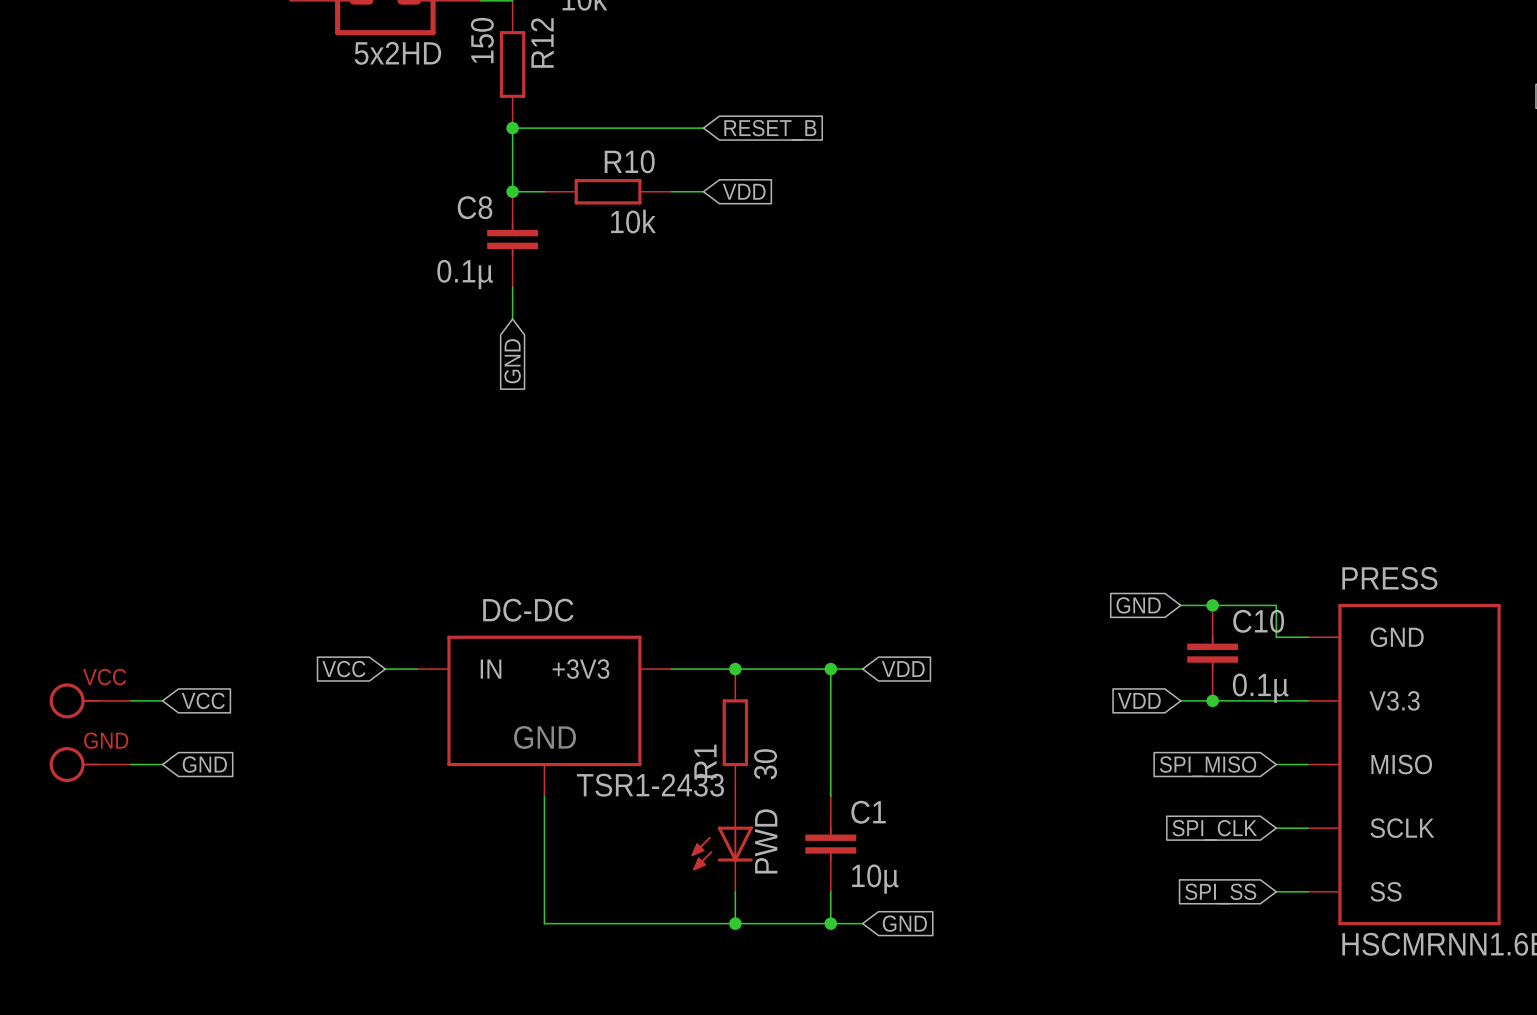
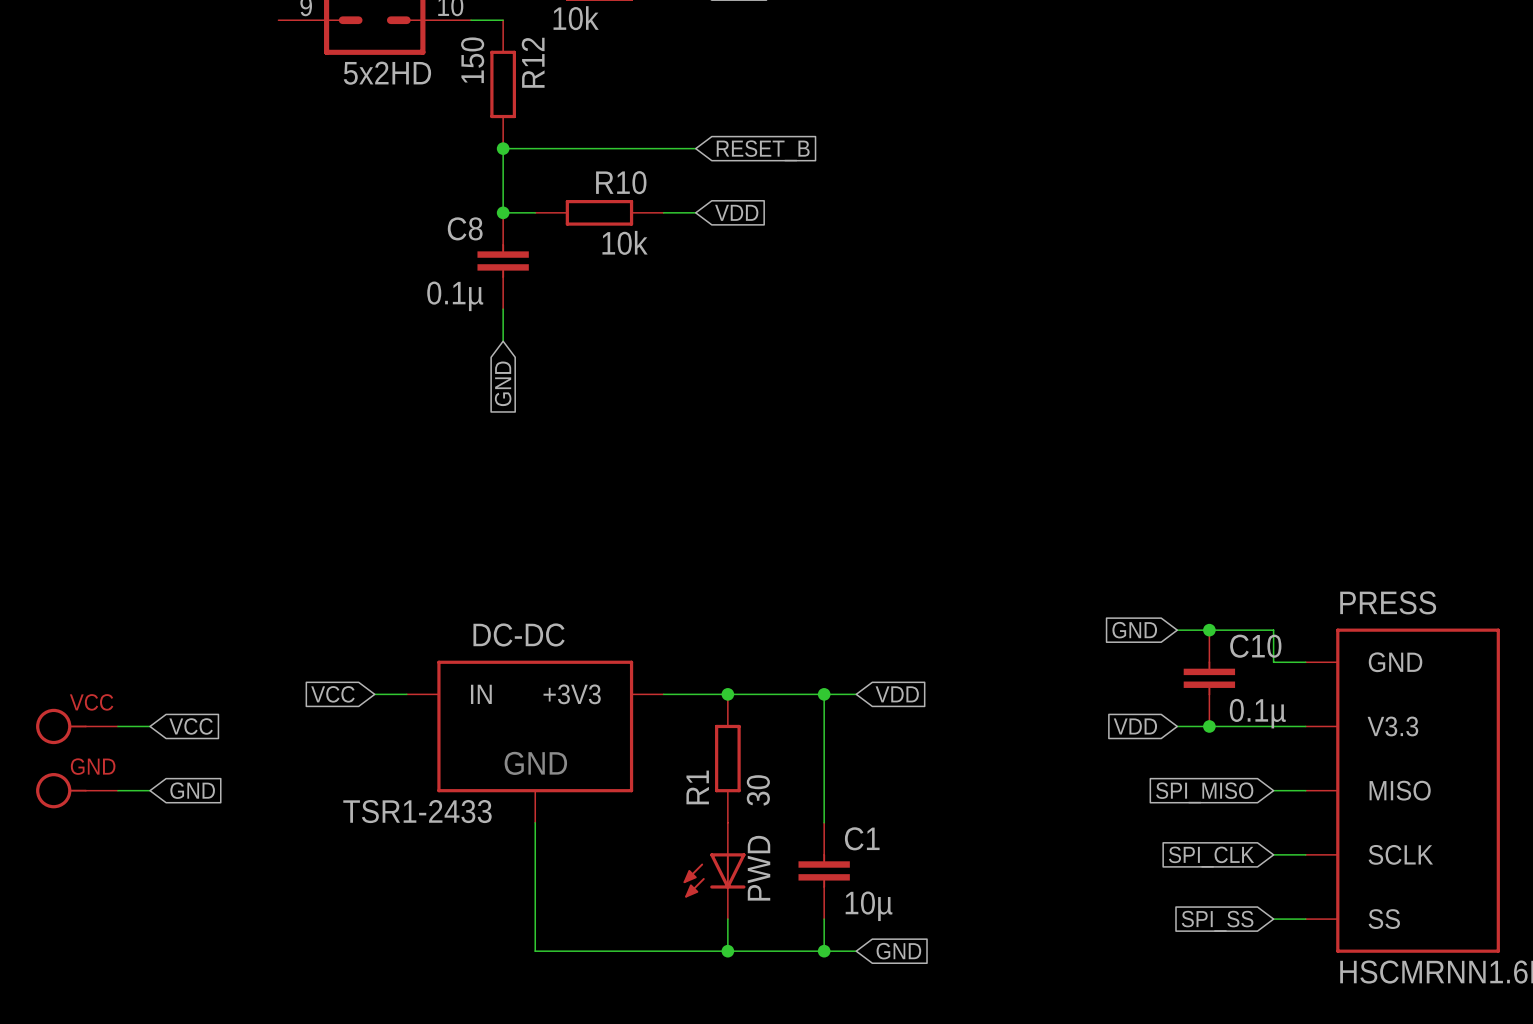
DC-DC value position: TSR1-2433 (650, 785) -> TSR1-2433 (417, 811)

